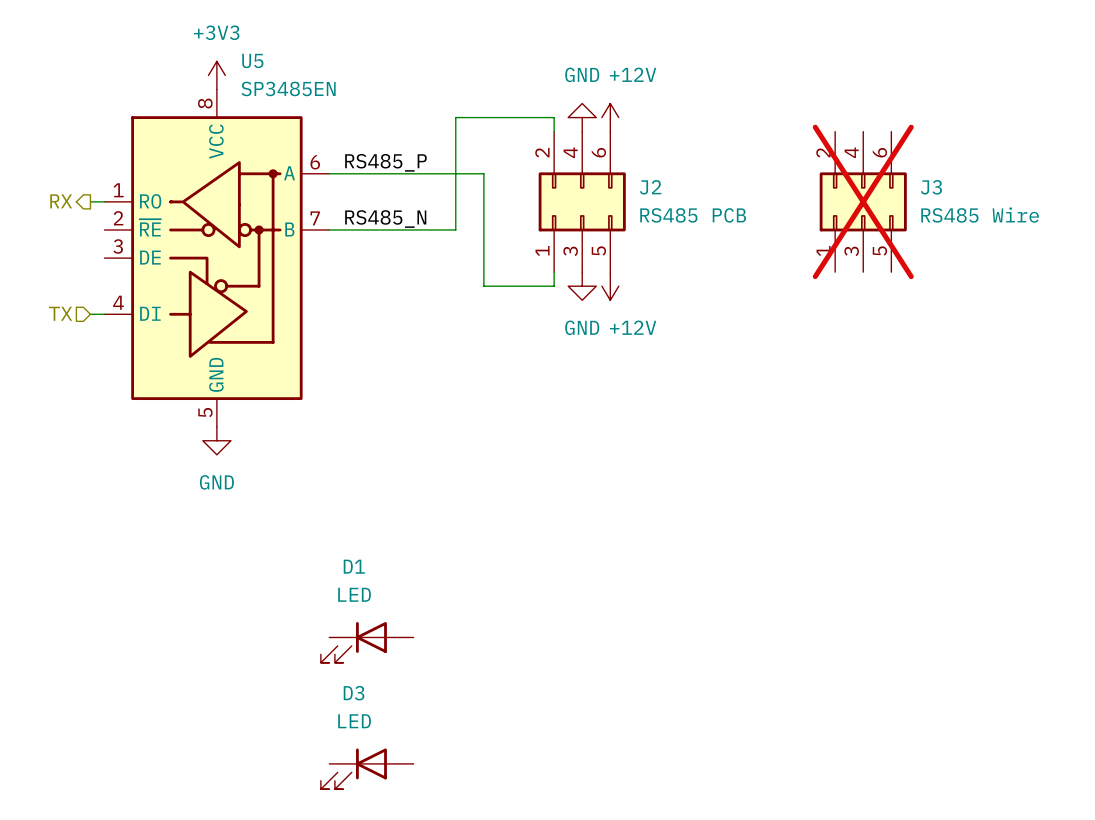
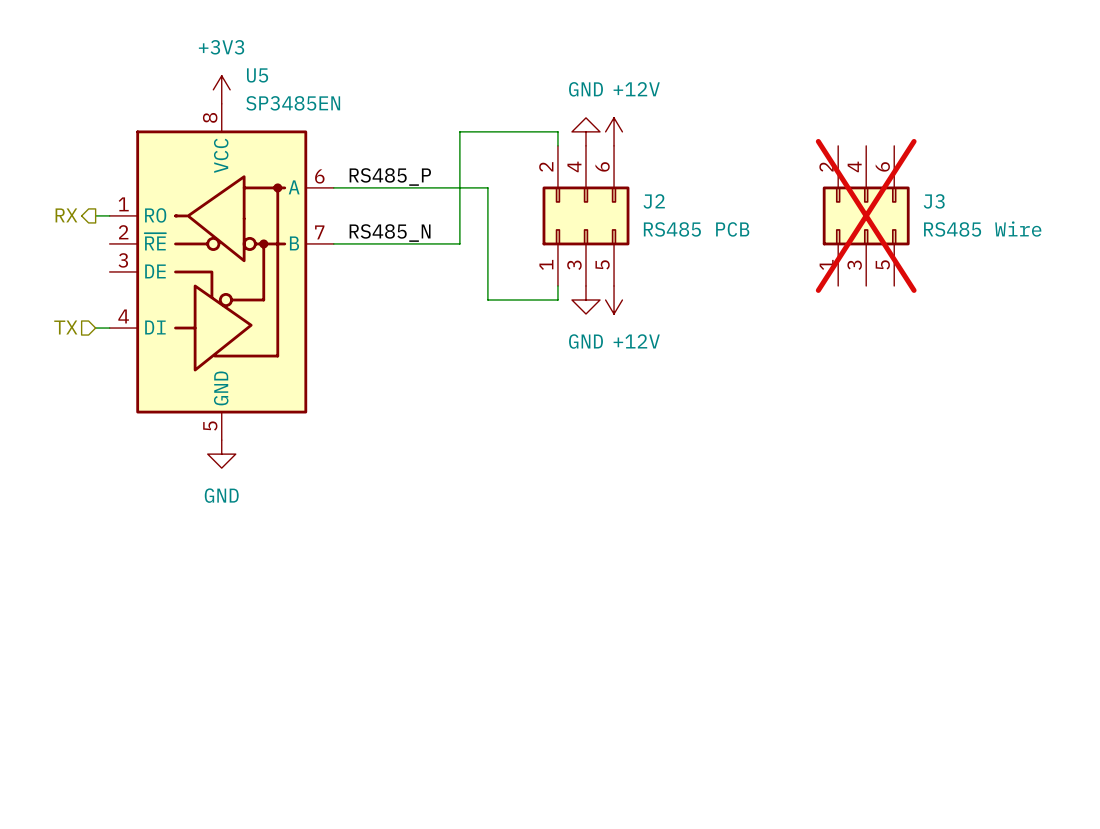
D1: LED (367, 642) -> none
D3: LED (367, 768) -> none

